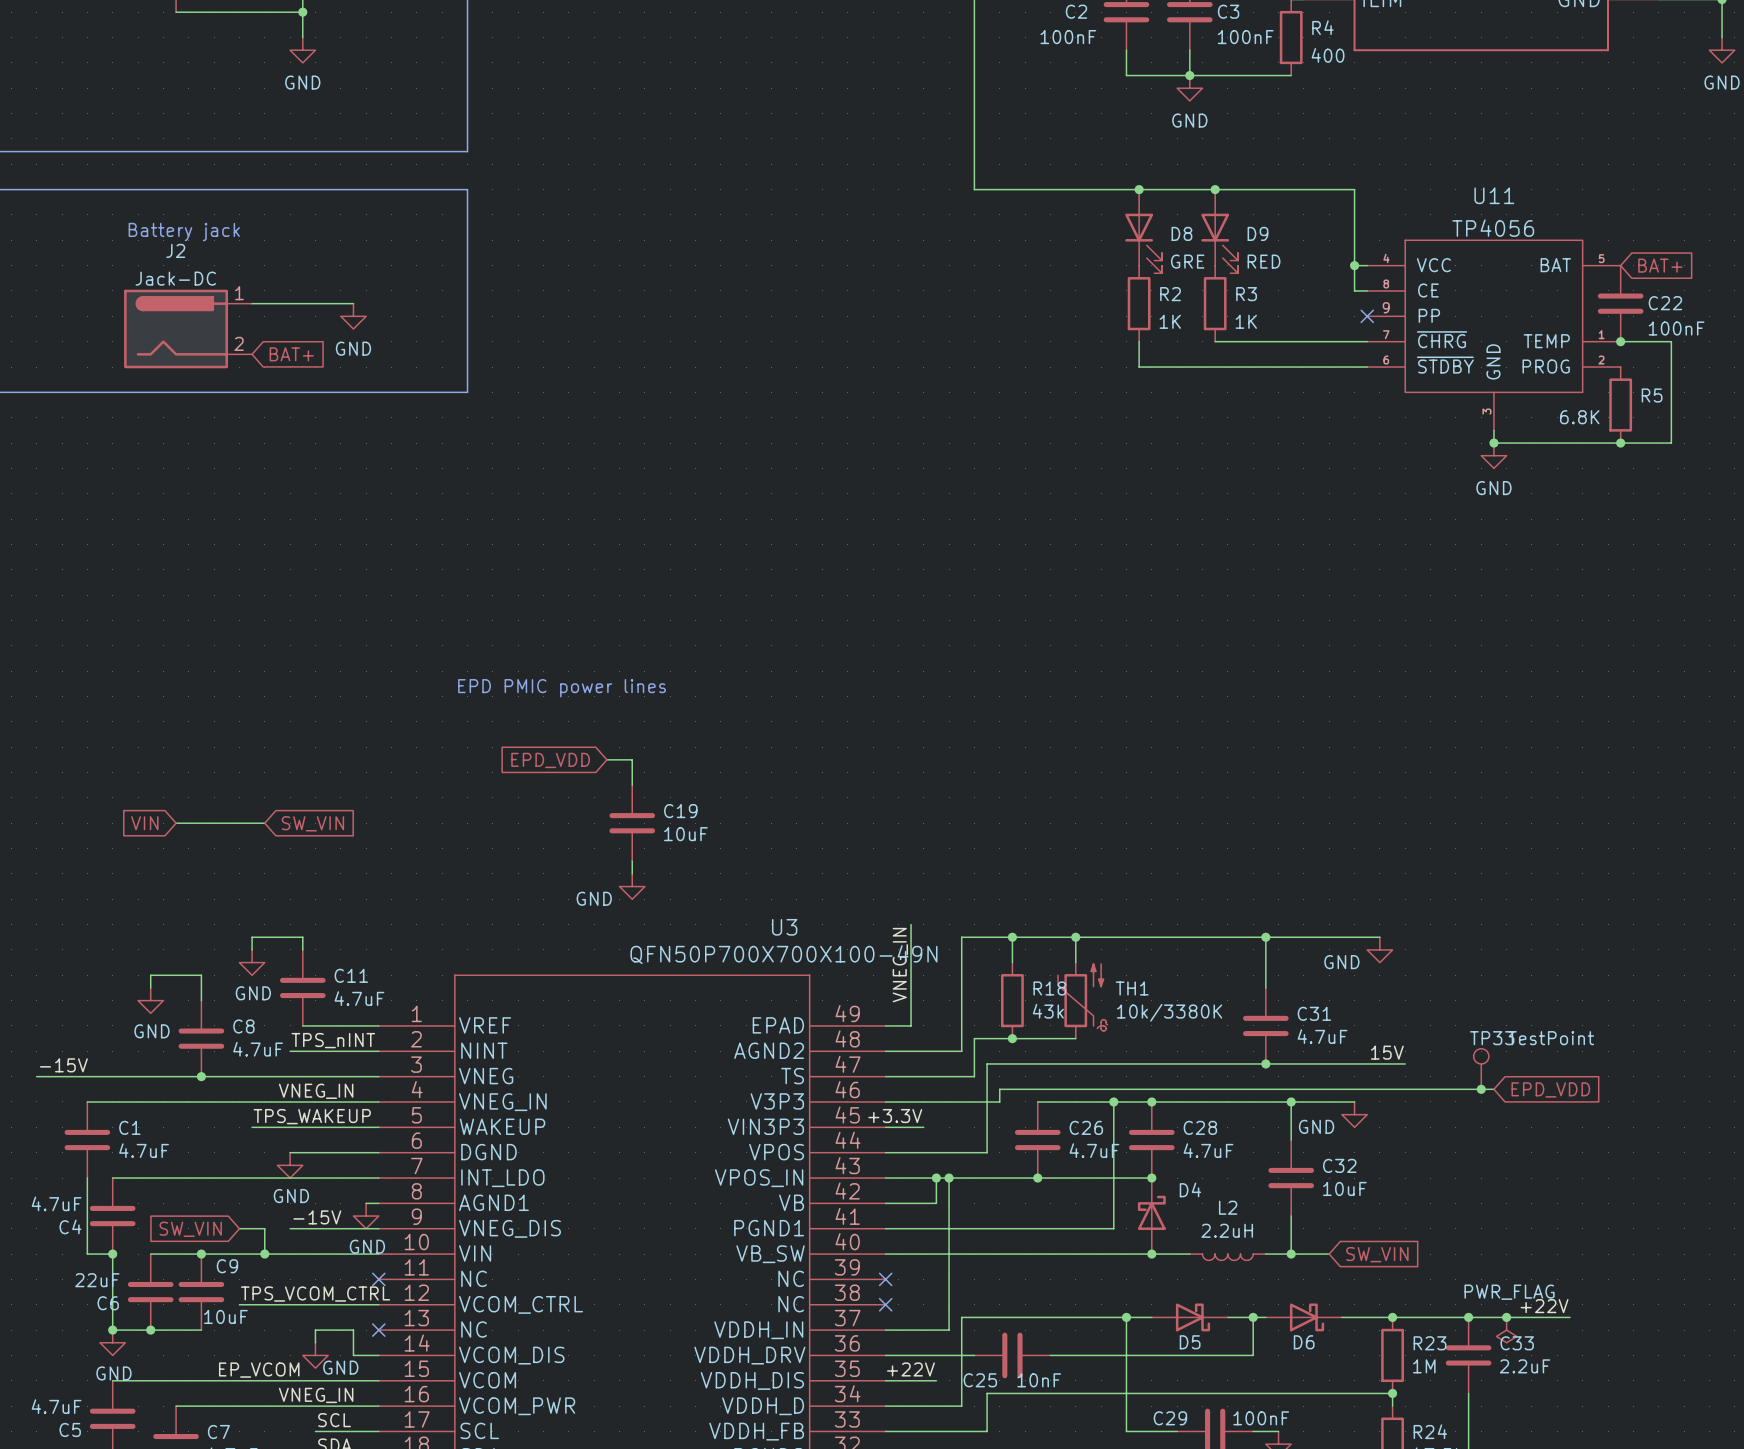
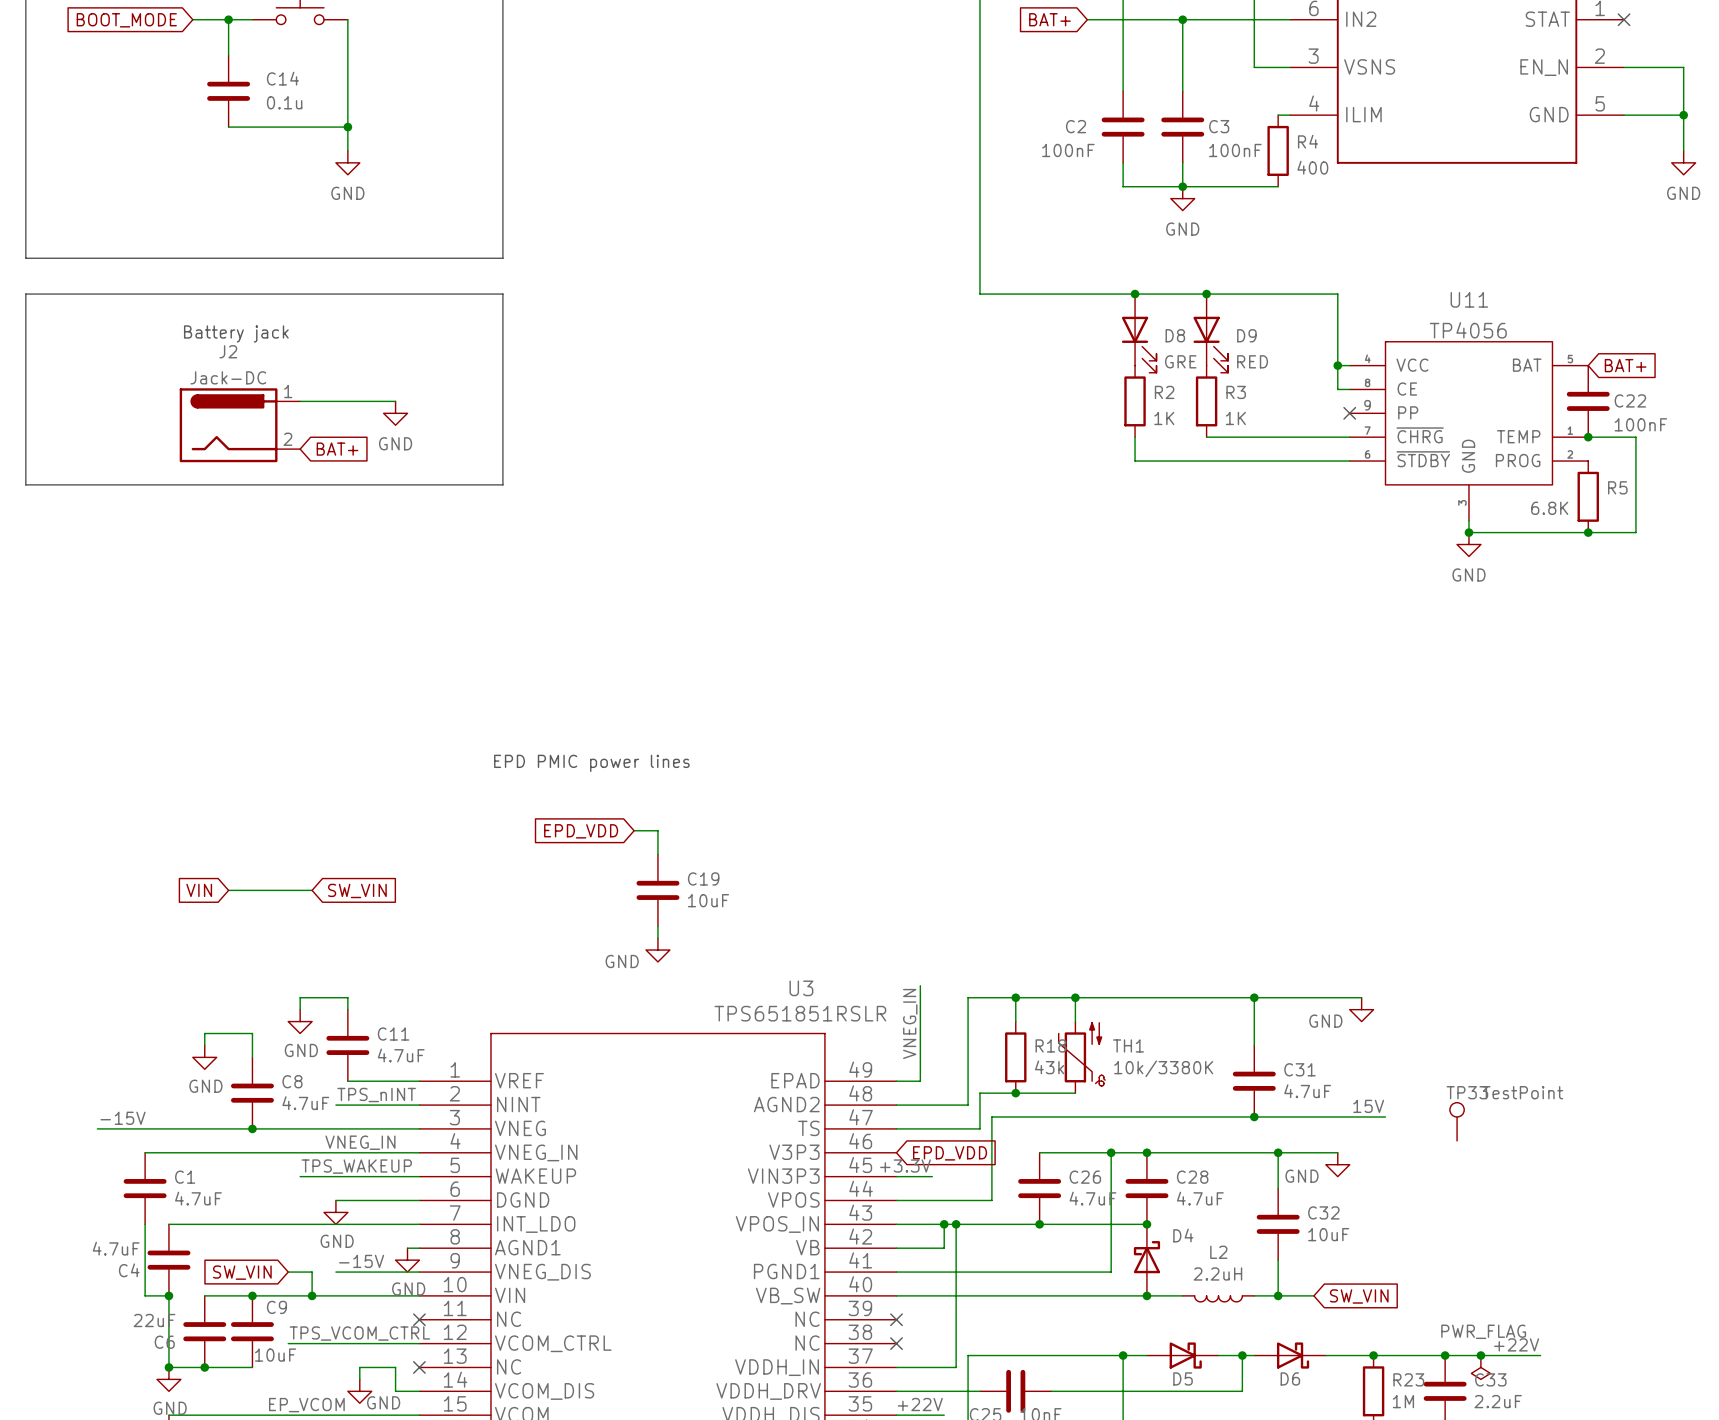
U3 value: QFN50P700X700X100-49N (783, 954) -> TPS651851RSLR (800, 1013)
junction: (1481, 1089) -> none
wire: (1493, 1089) (999, 1089) (999, 1101) (885, 1101) -> none
global label: EPD_VDD (1550, 1089) -> none
global label: none -> EPD_VDD (950, 1153)

